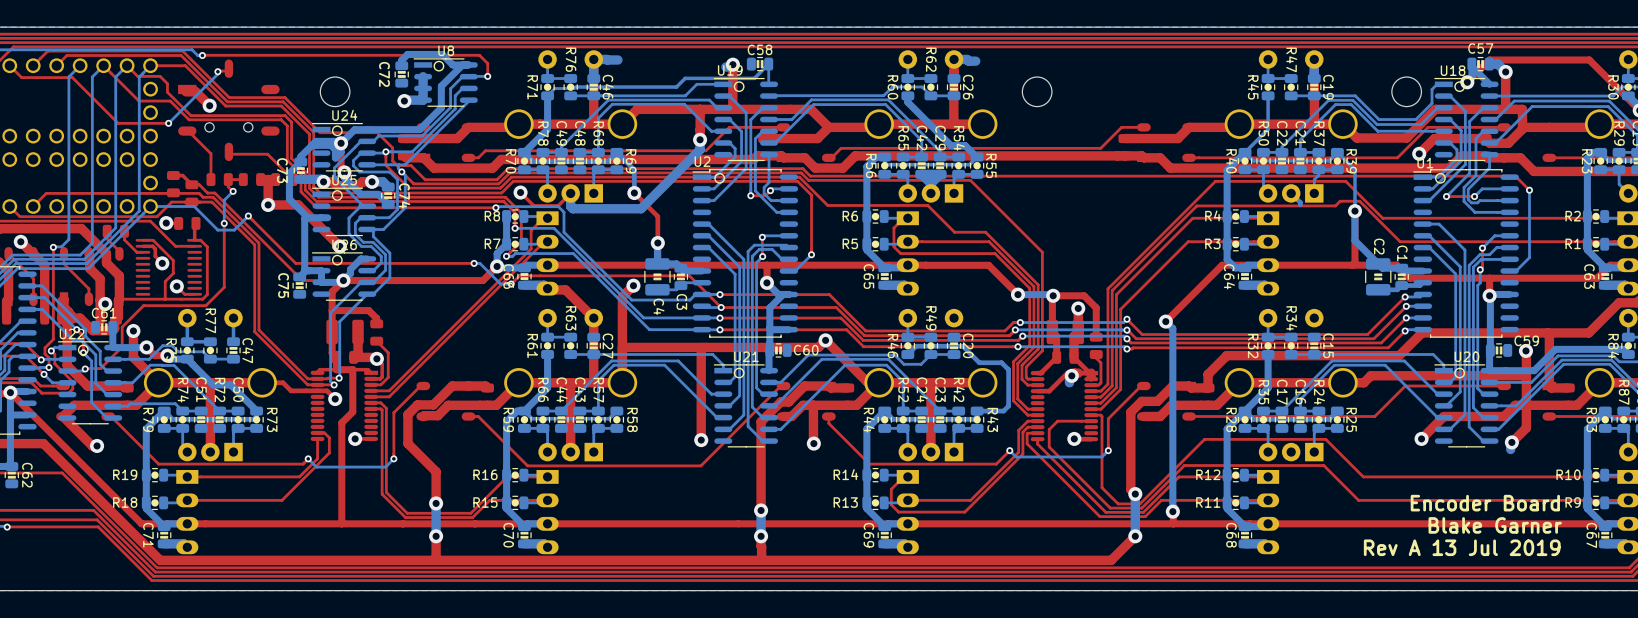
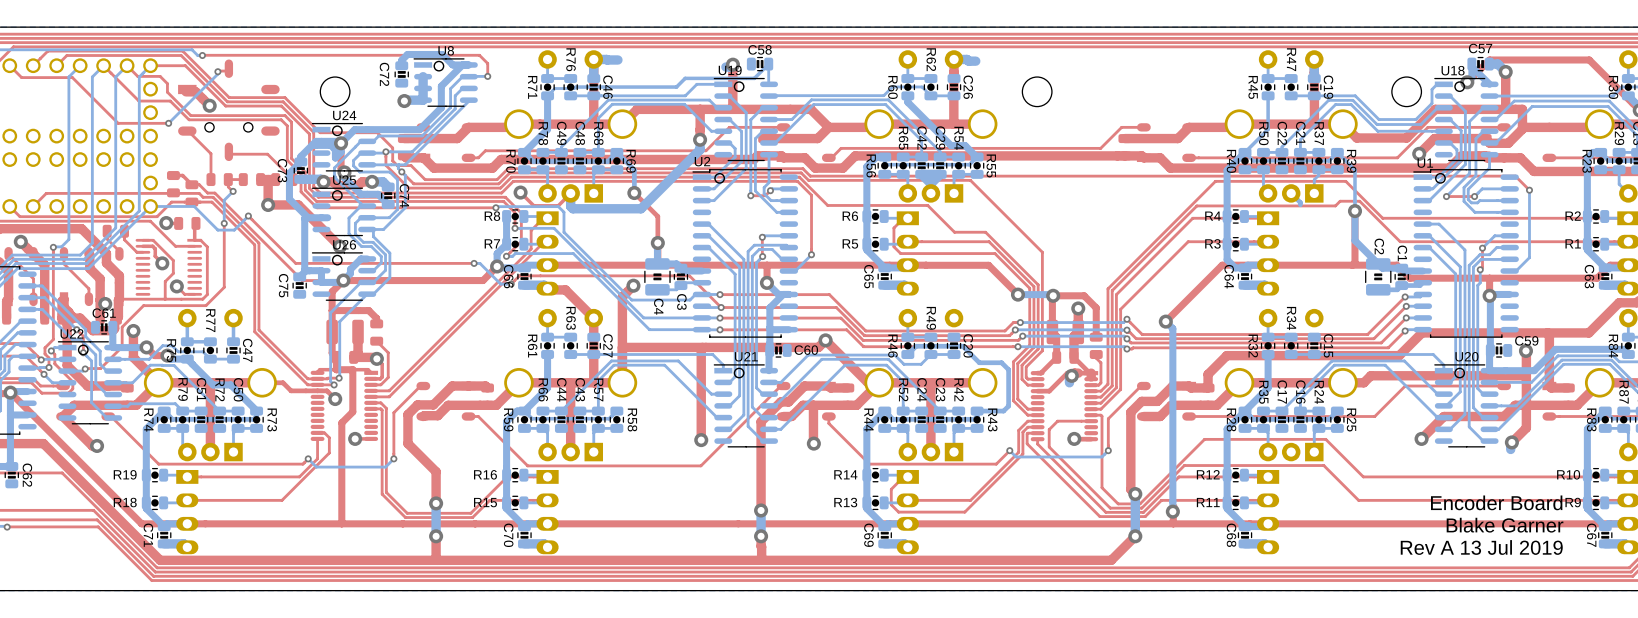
R74 name position: R74 (183, 390) -> R74 (148, 420)
R79 name position: R79 (148, 419) -> R79 (183, 389)

